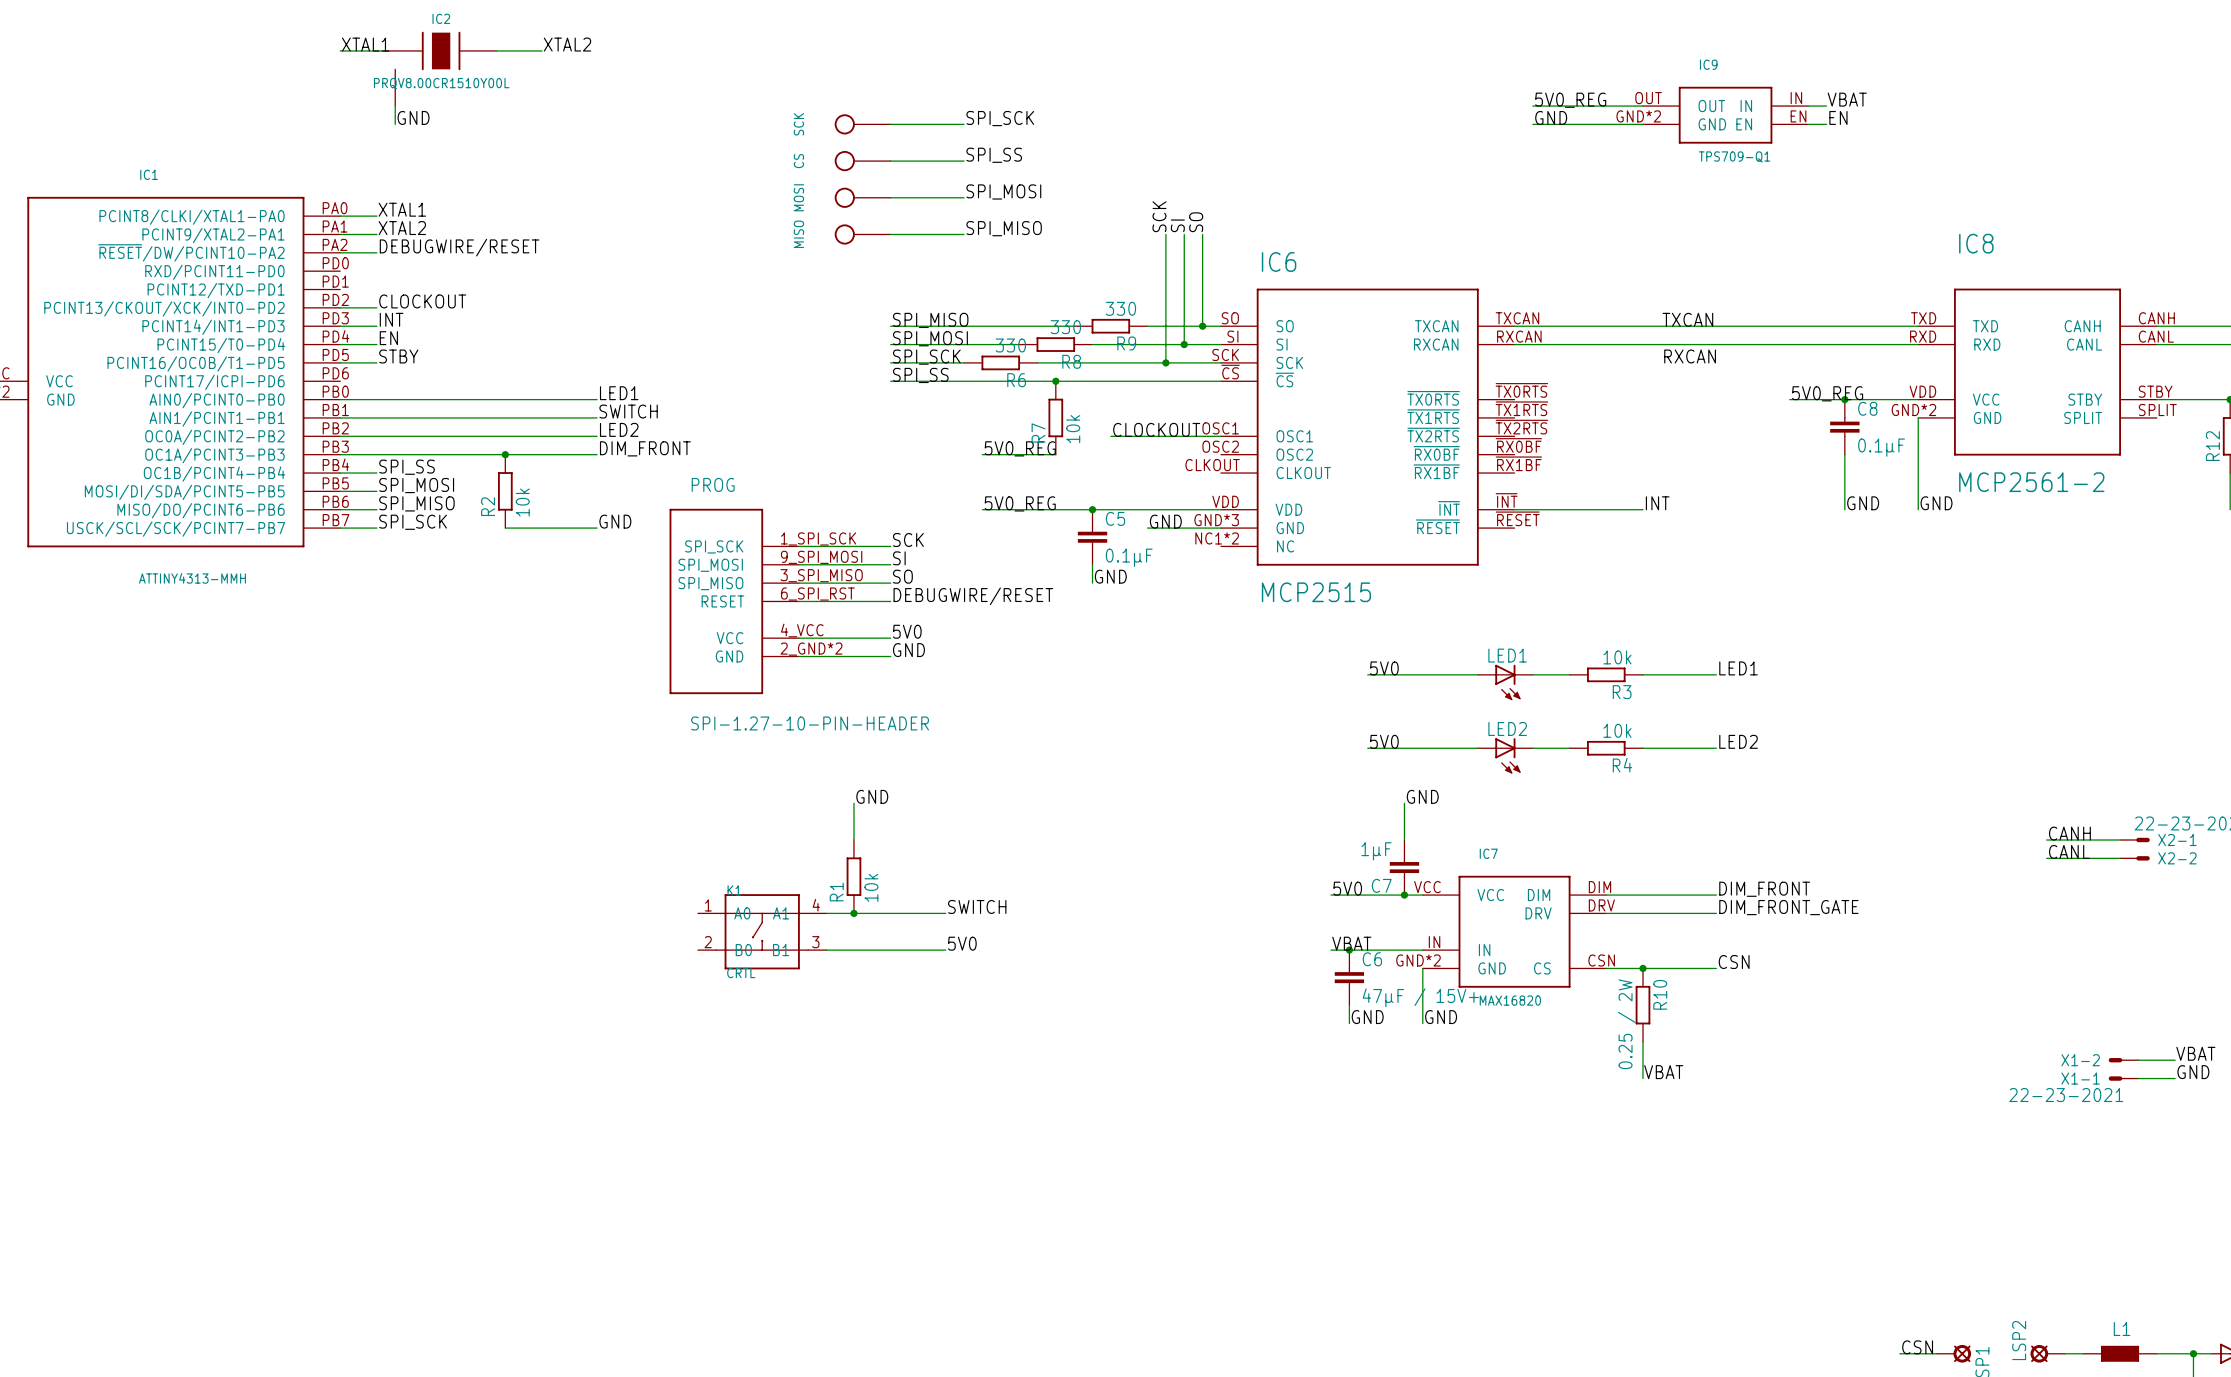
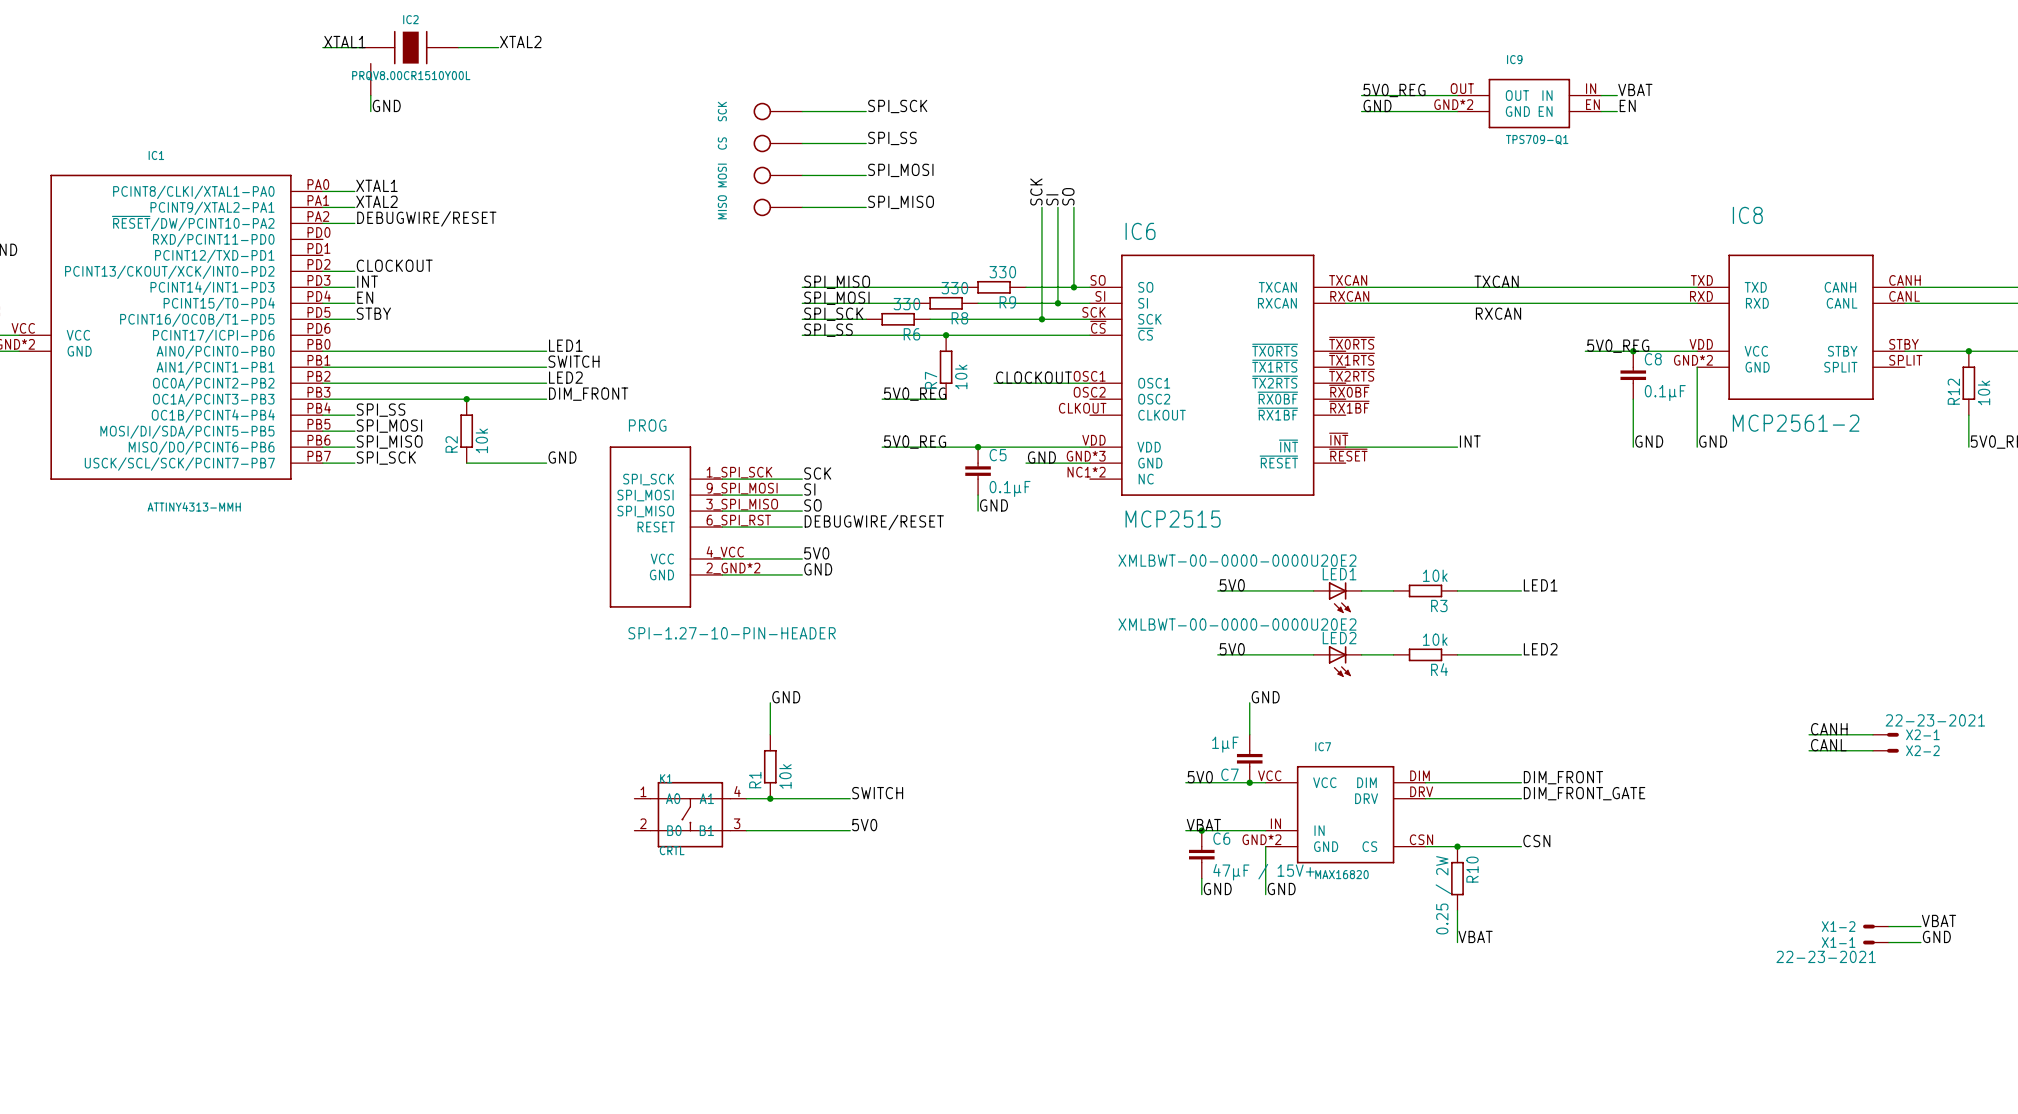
LED1 value: none -> XMLBWT-00-0000-0000U20E2 (1237, 560)
LED2 value: none -> XMLBWT-00-0000-0000U20E2 (1237, 624)

